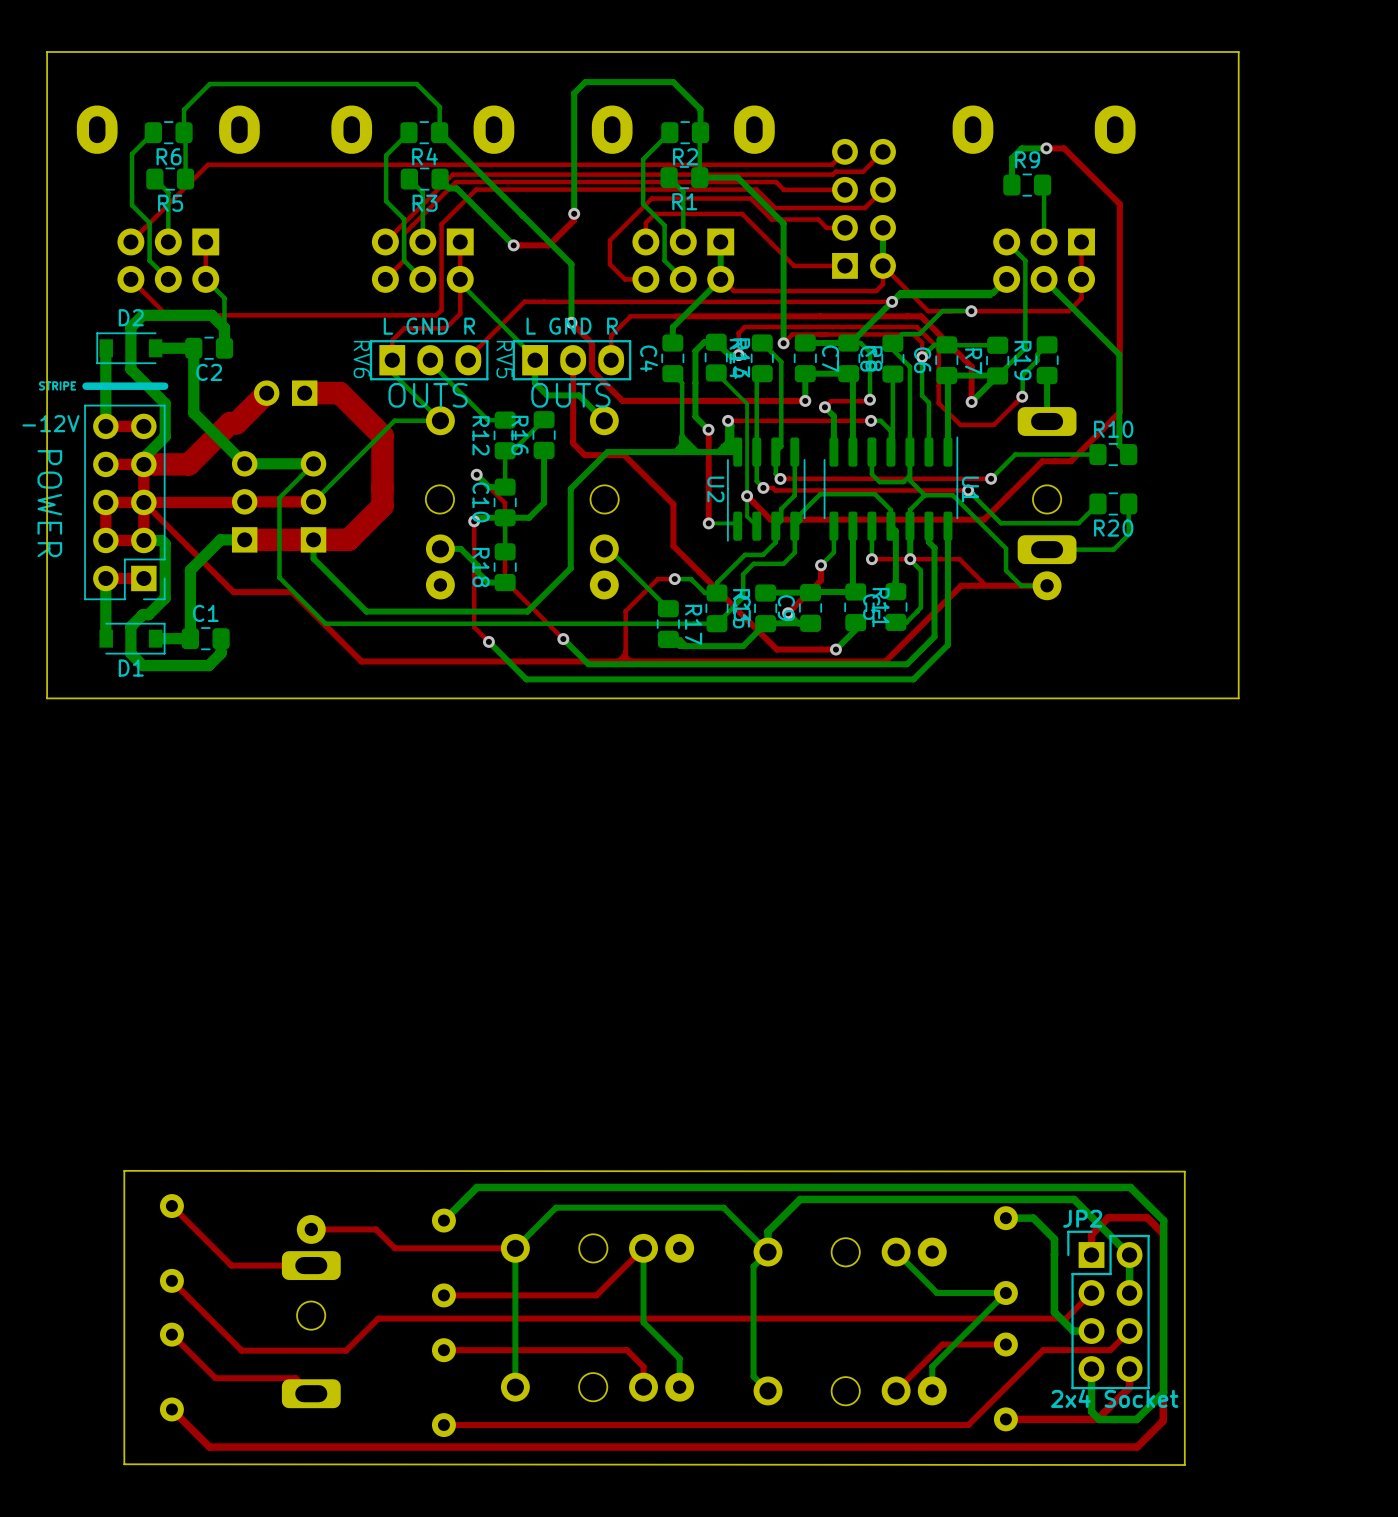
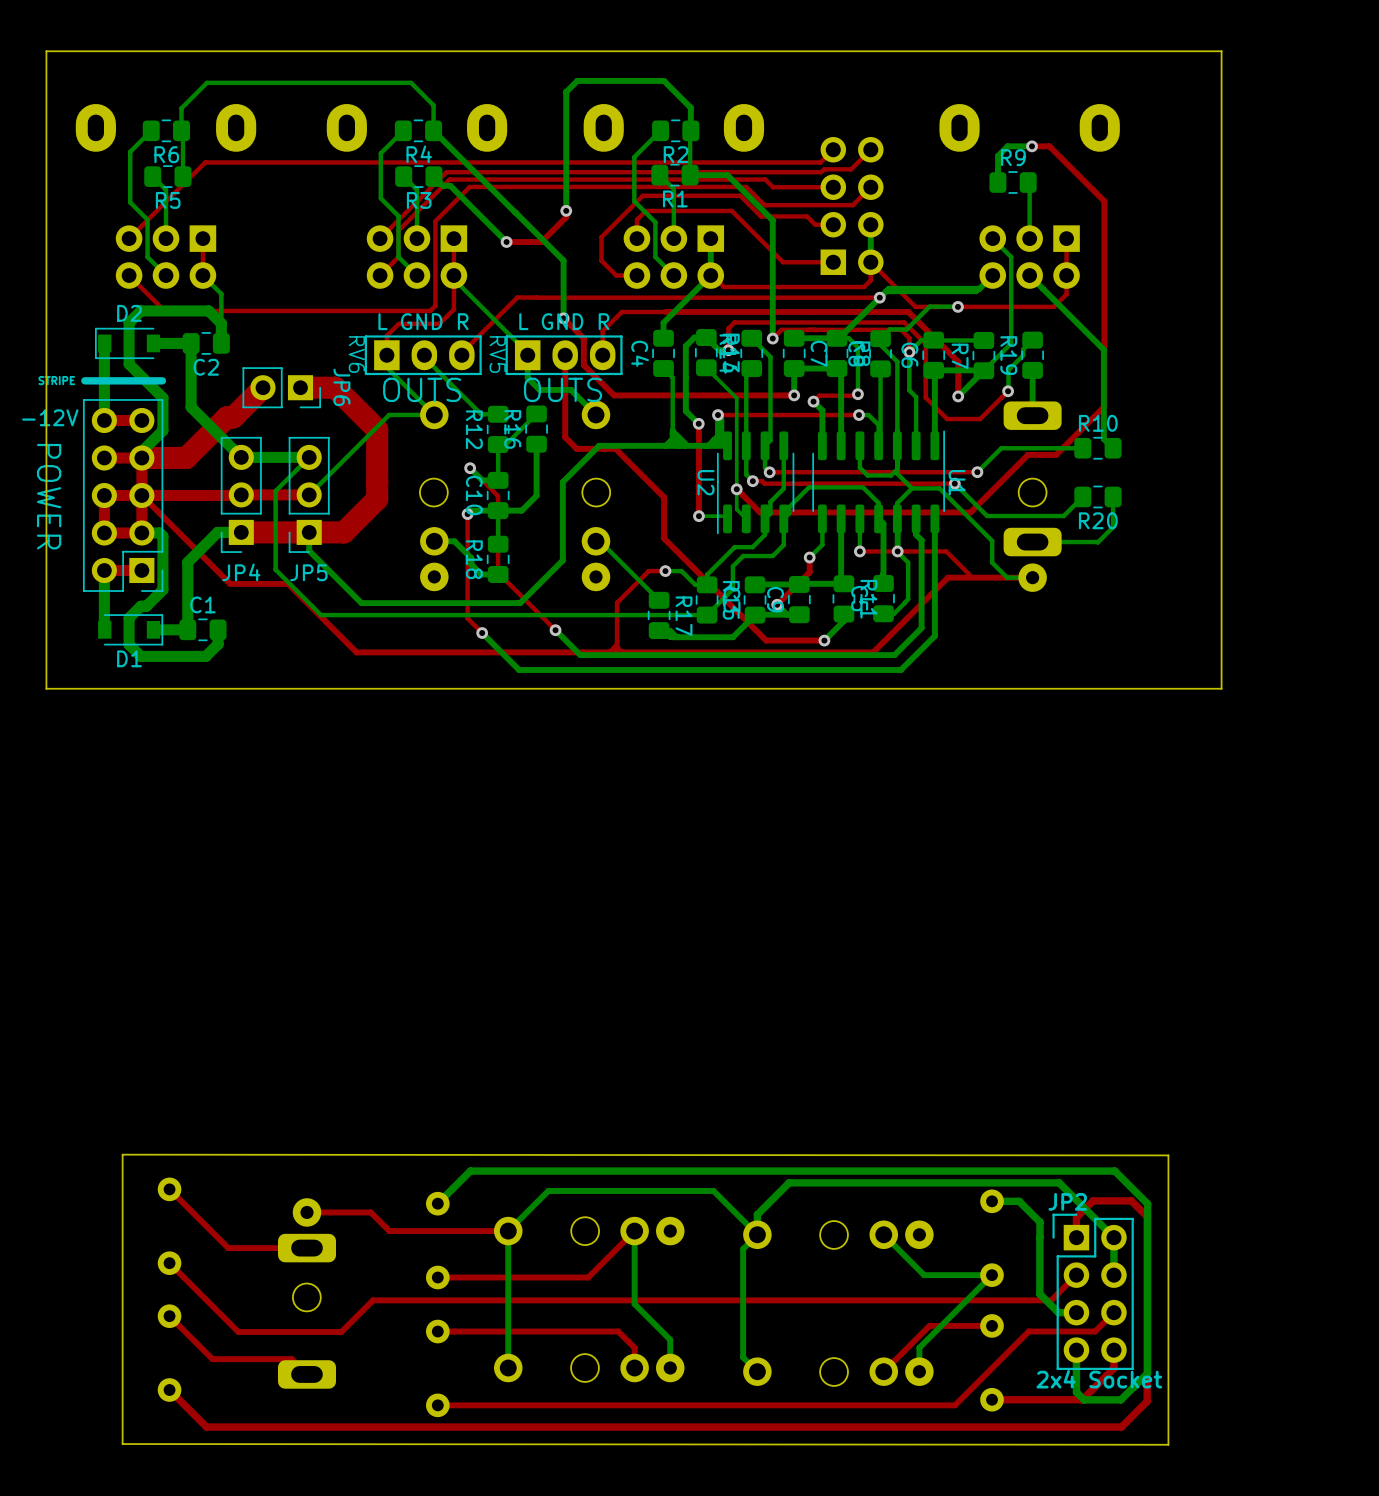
JP6 side: top (285, 393) -> bottom (281, 387)
JP4 side: top (244, 501) -> bottom (241, 494)
JP5 side: top (313, 501) -> bottom (309, 494)

